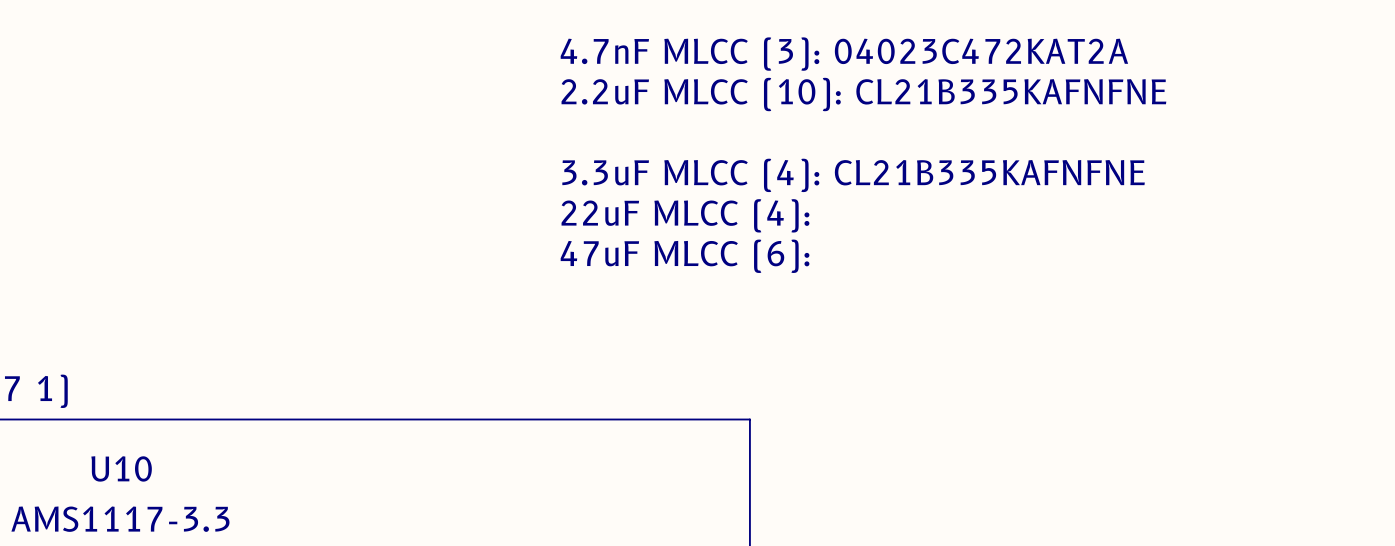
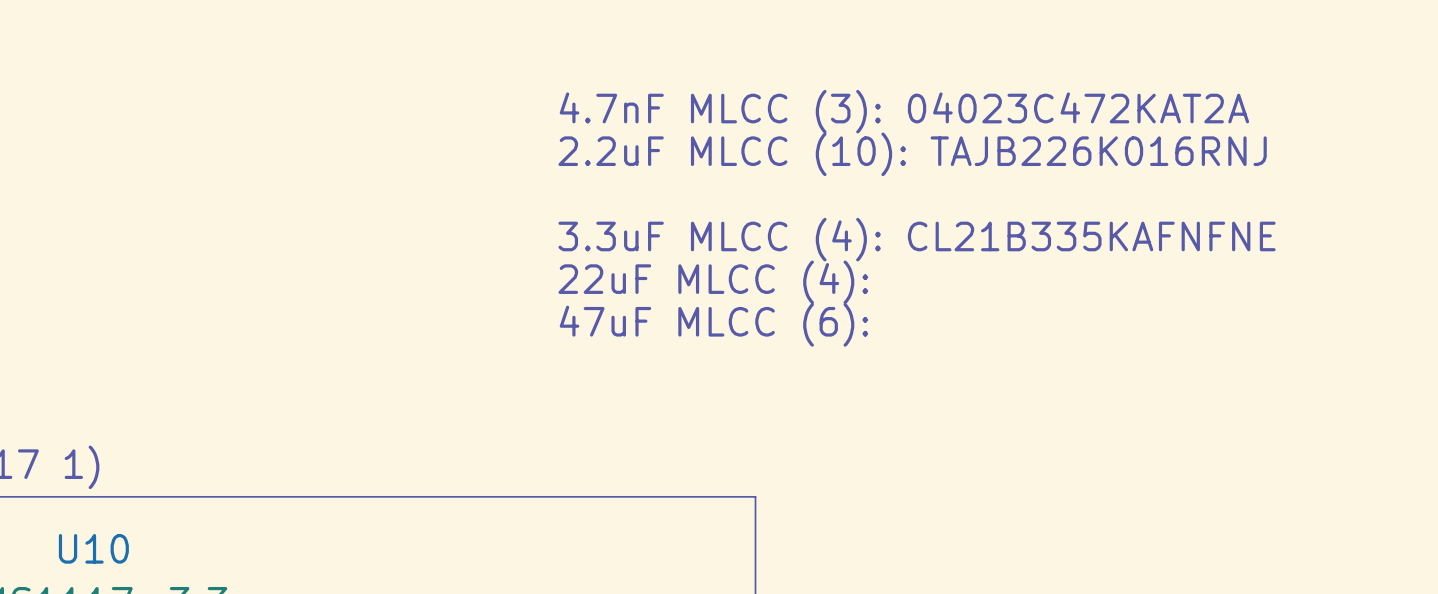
text: 2.2uF MLCC (10): CL21B335KAFNFNE (863, 94) -> 2.2uF MLCC (10): TAJB226K016RNJ (912, 154)

